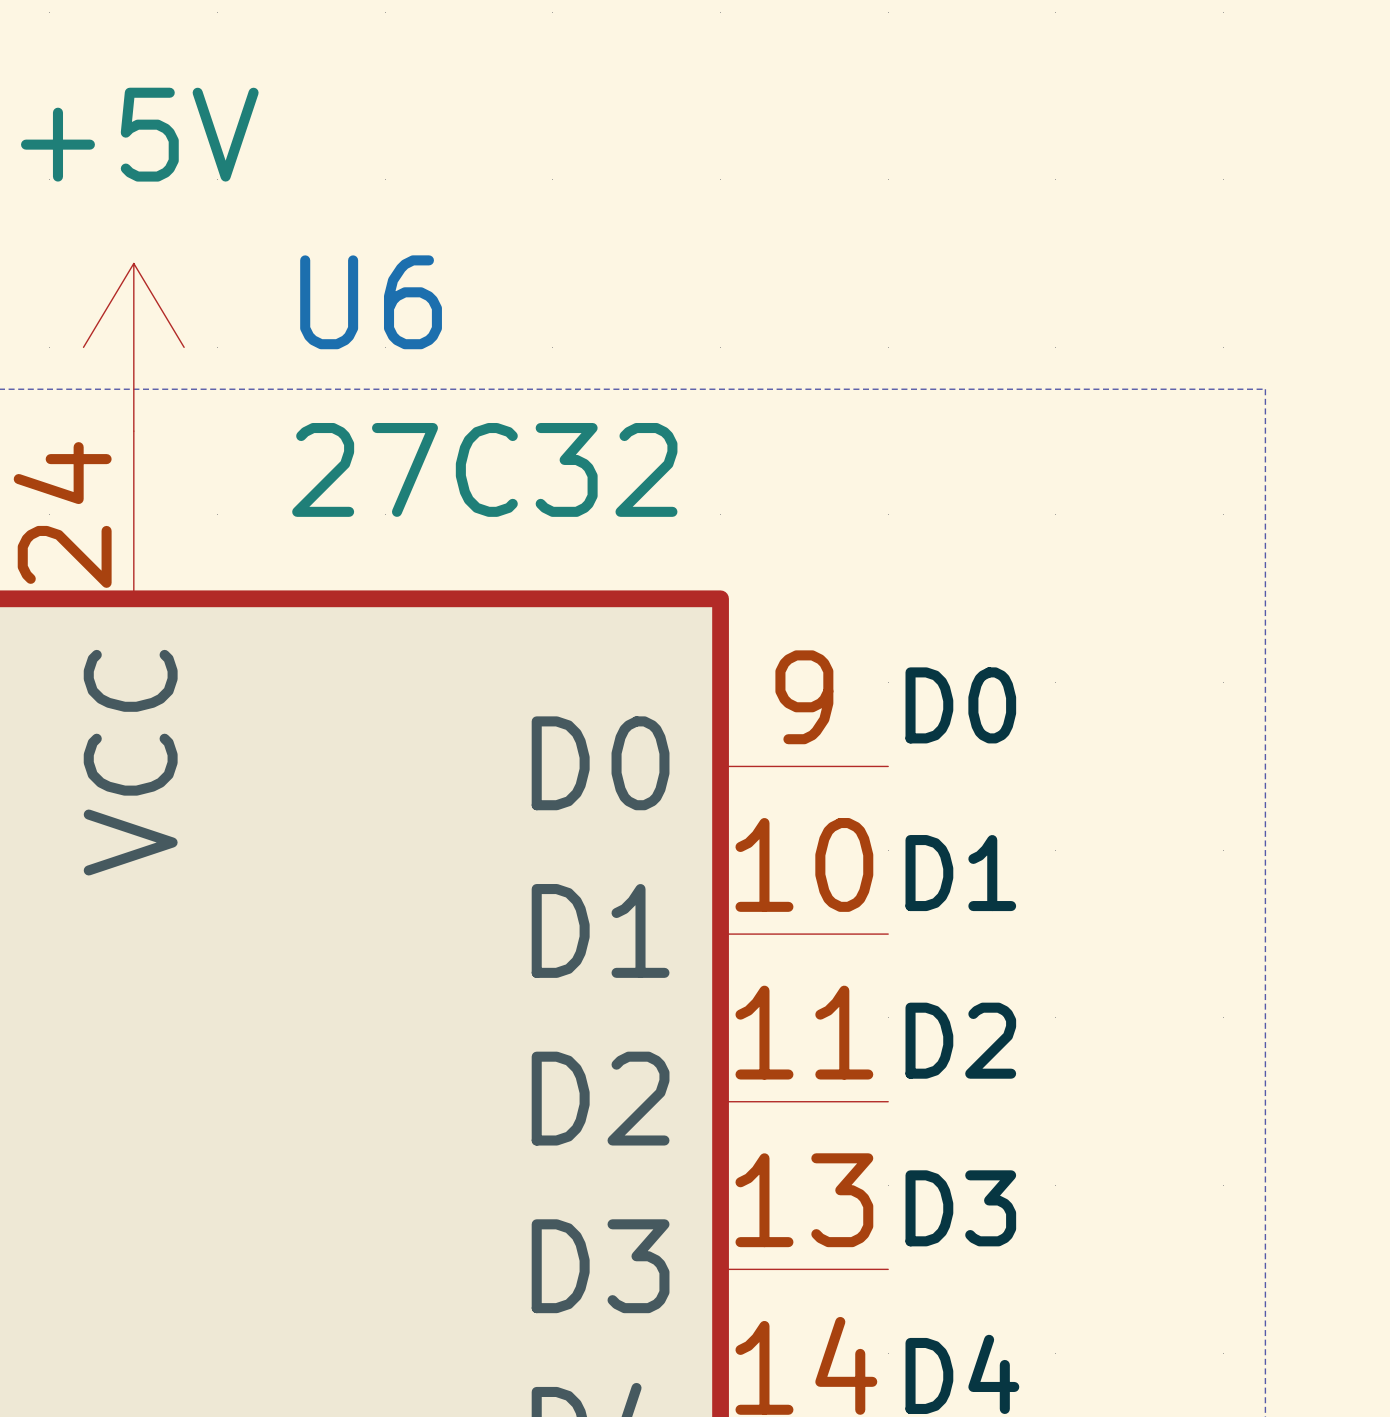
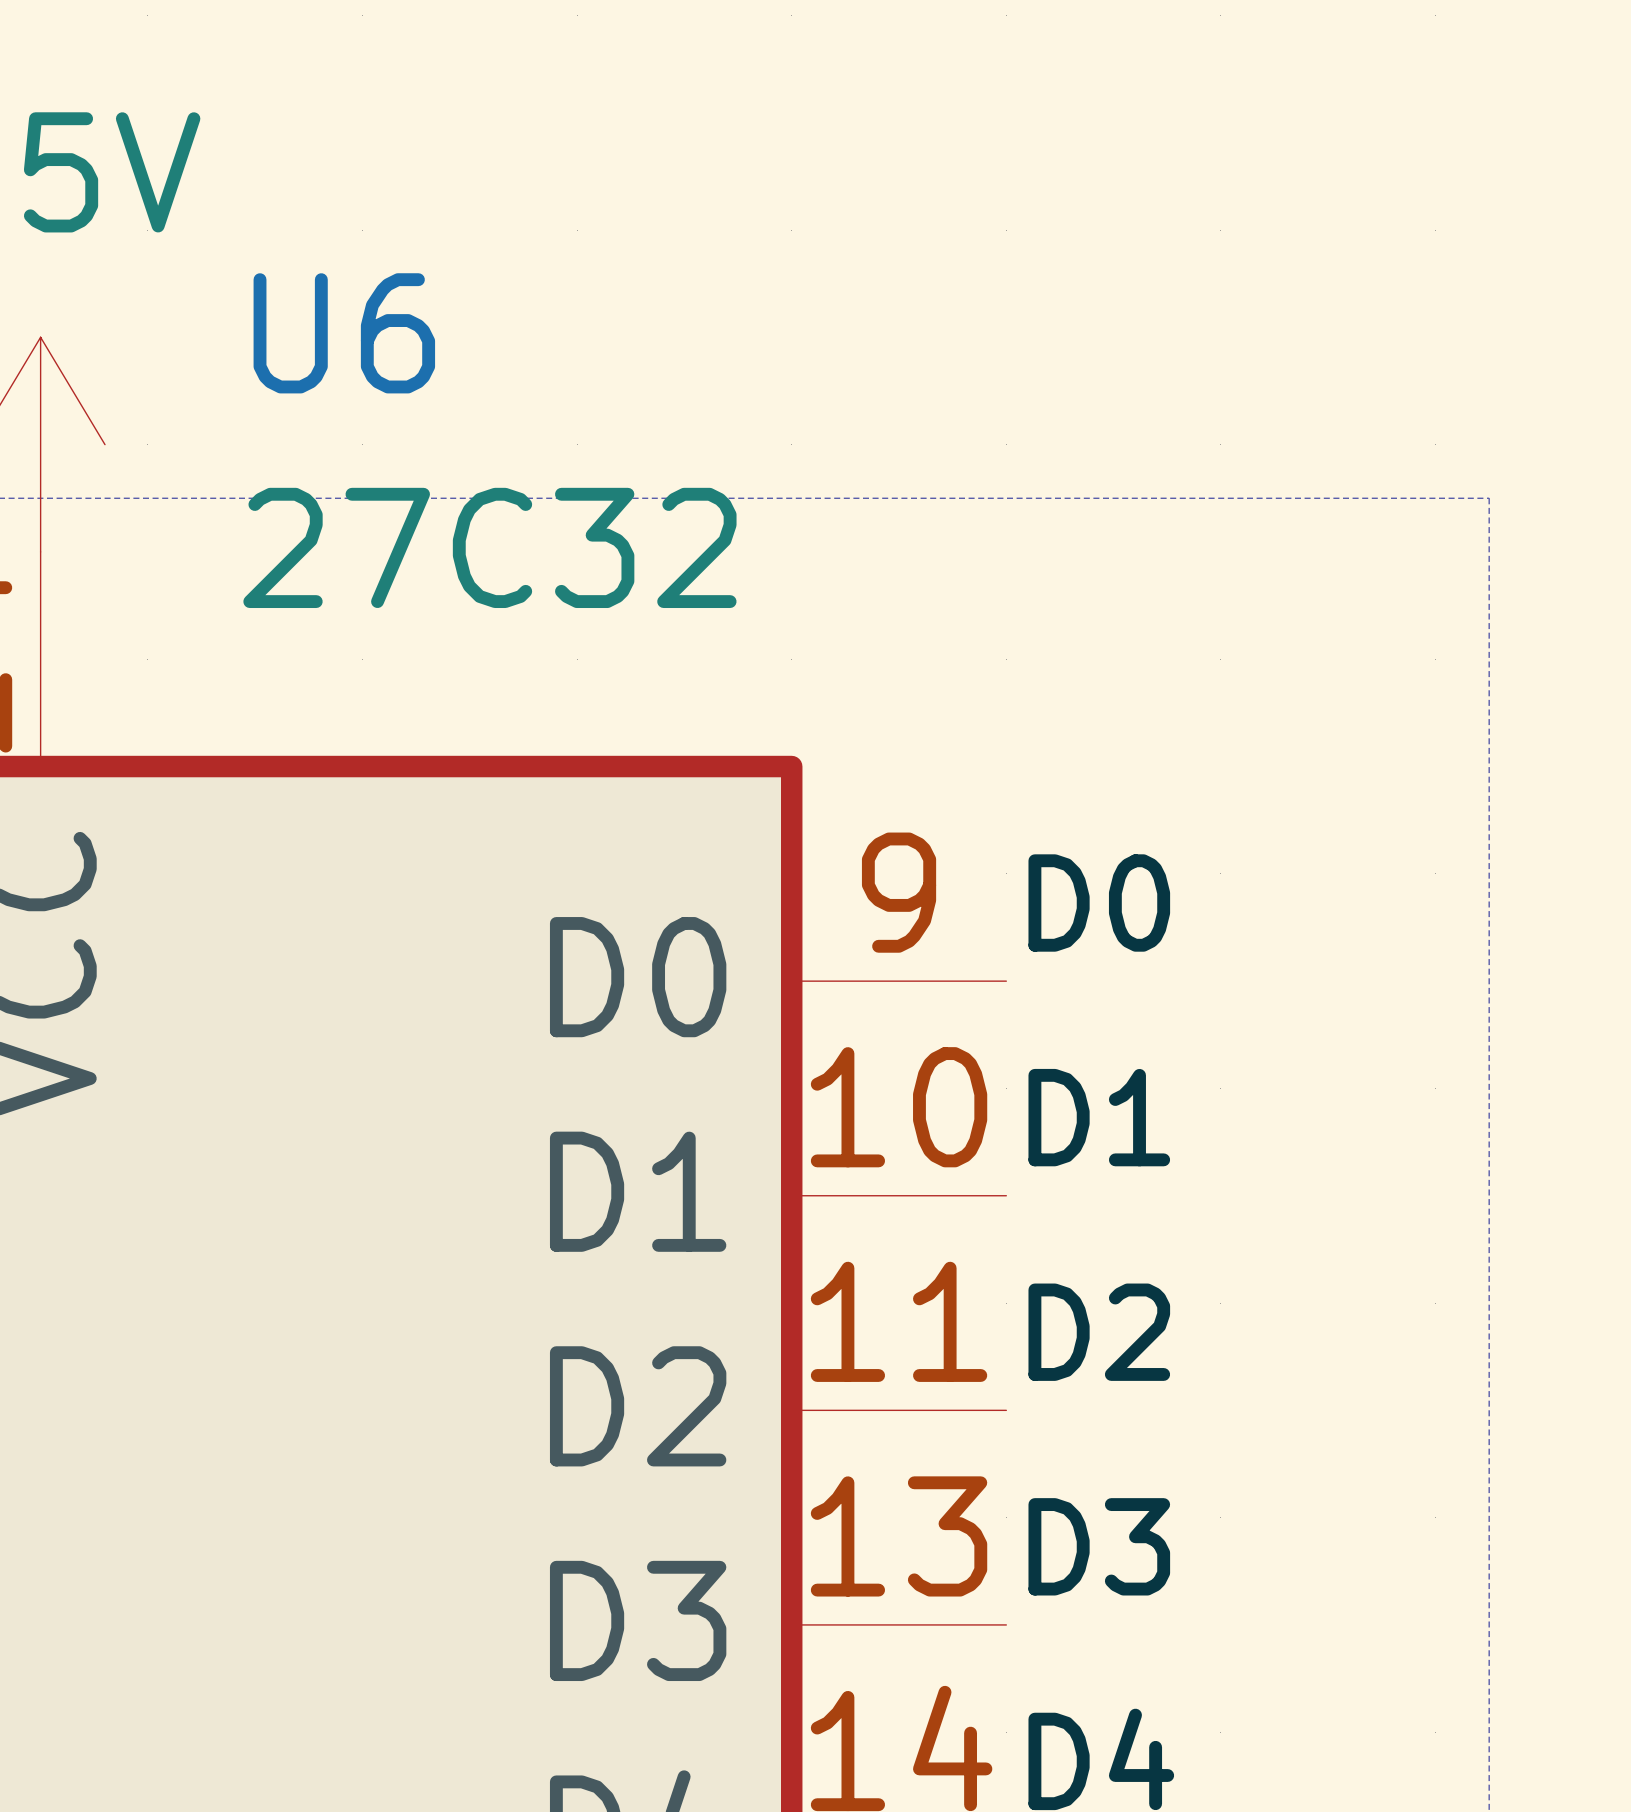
U6 name position: U6 (371, 302) -> U6 (344, 333)
U6 value position: 27C32 (484, 469) -> 27C32 (489, 547)

